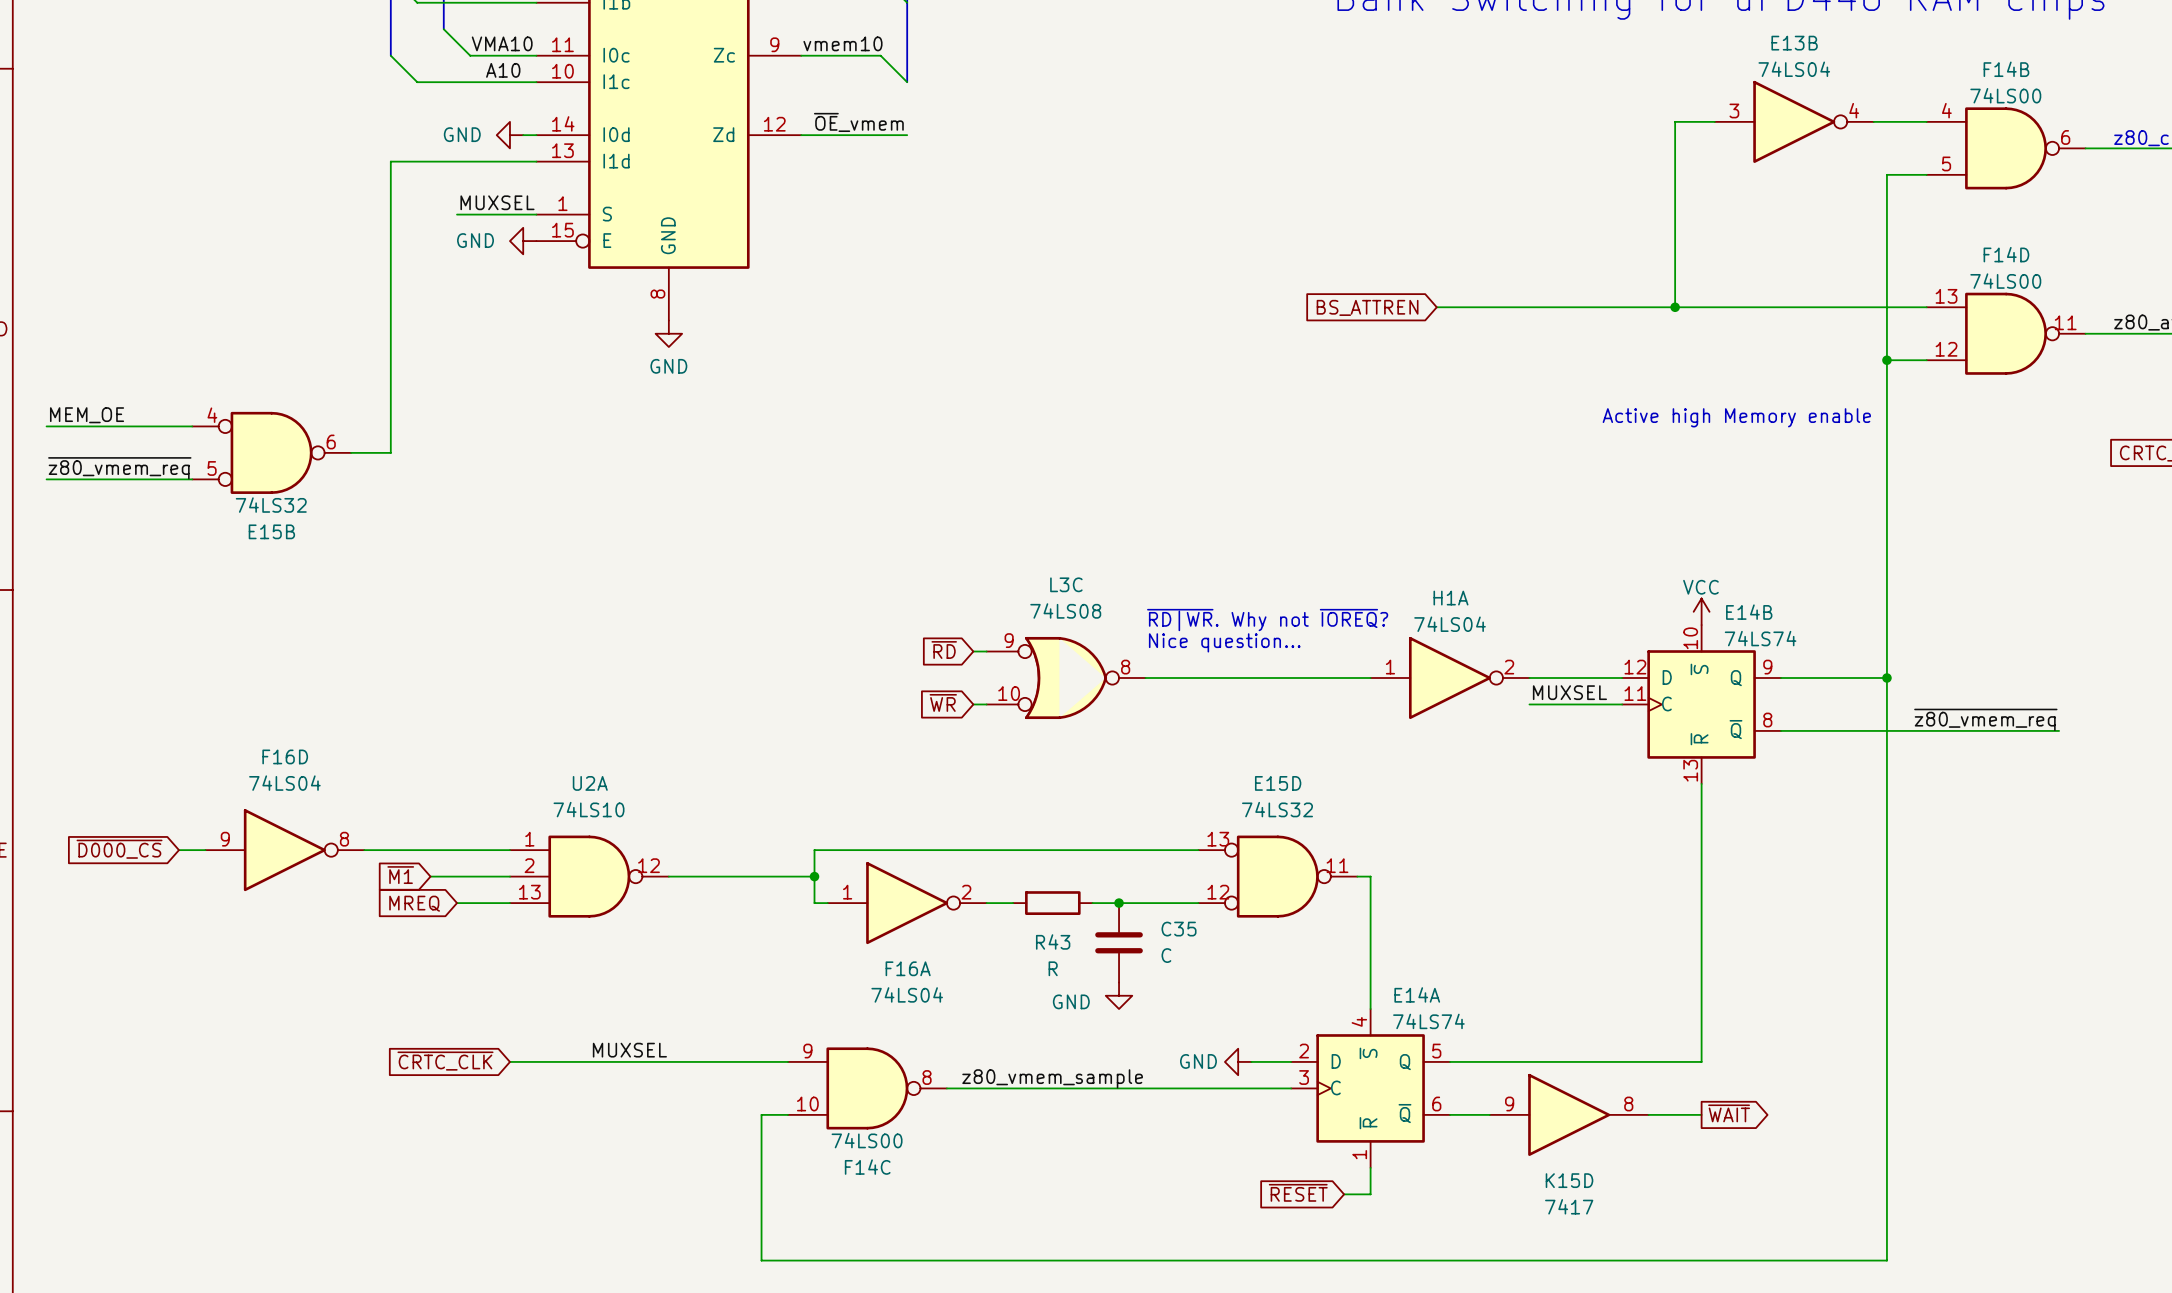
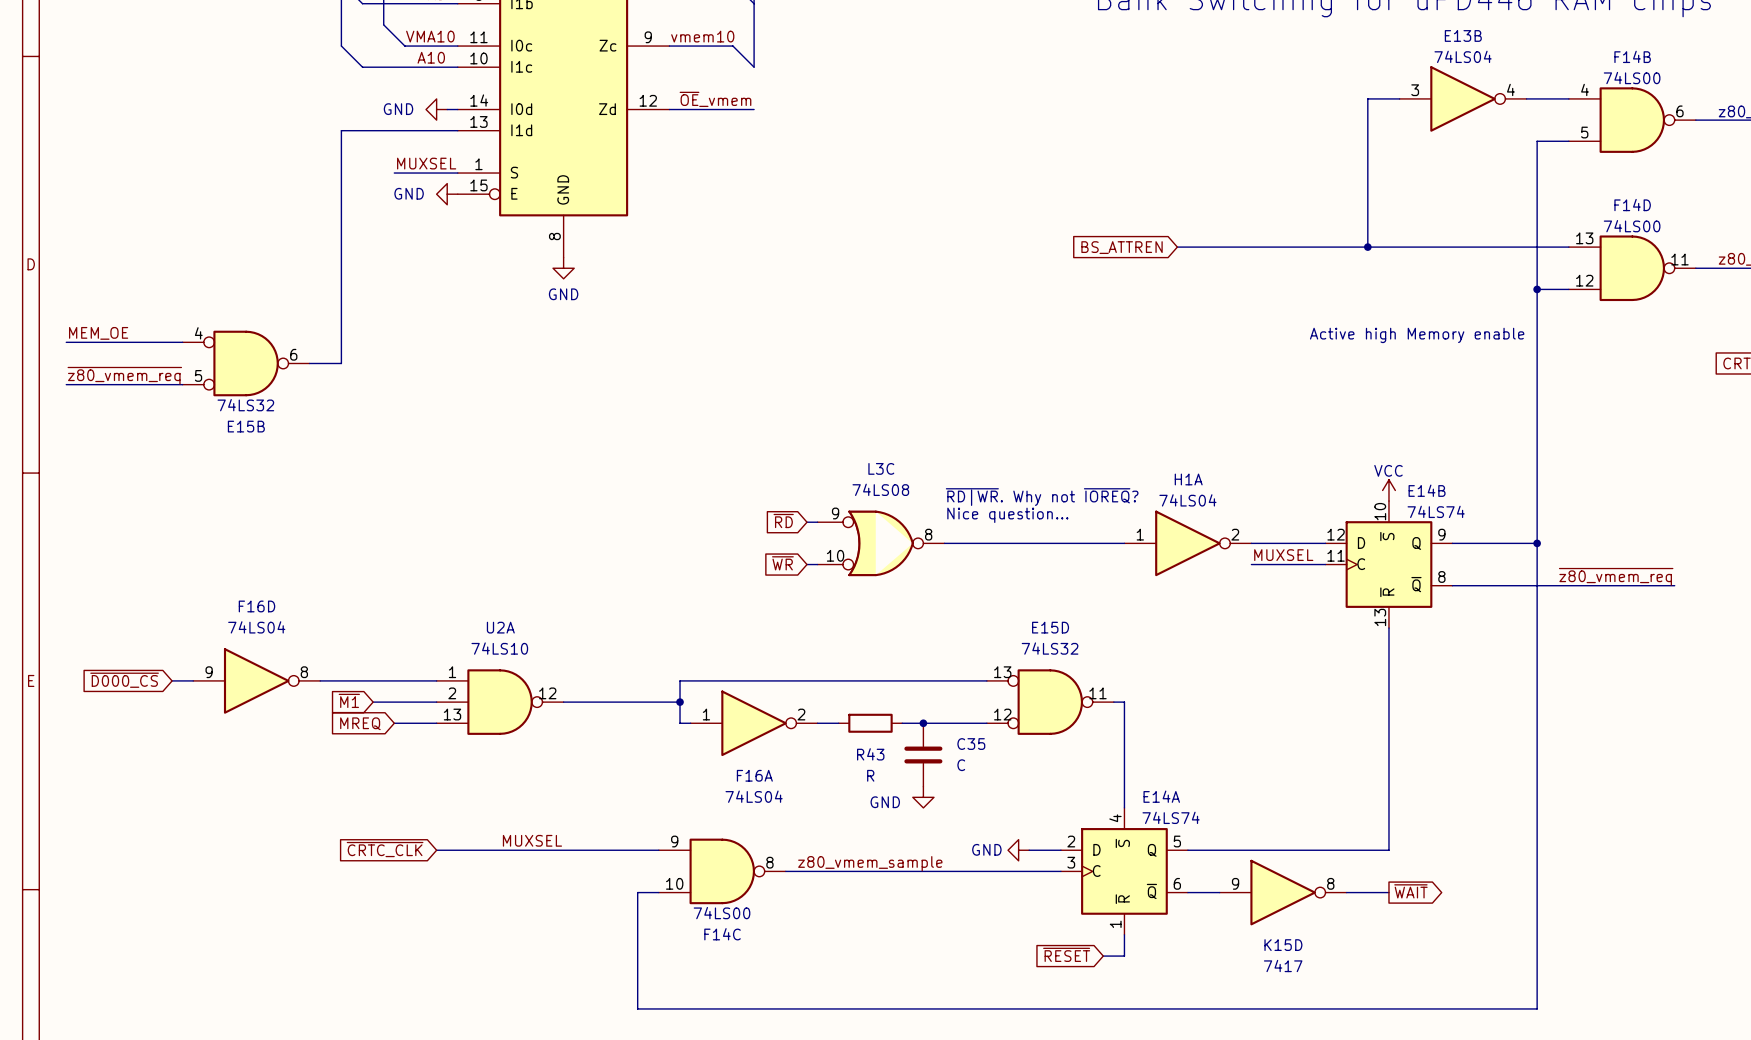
K15D symbol: [1489, 1073, 1649, 1156] -> [1219, 859, 1347, 926]

